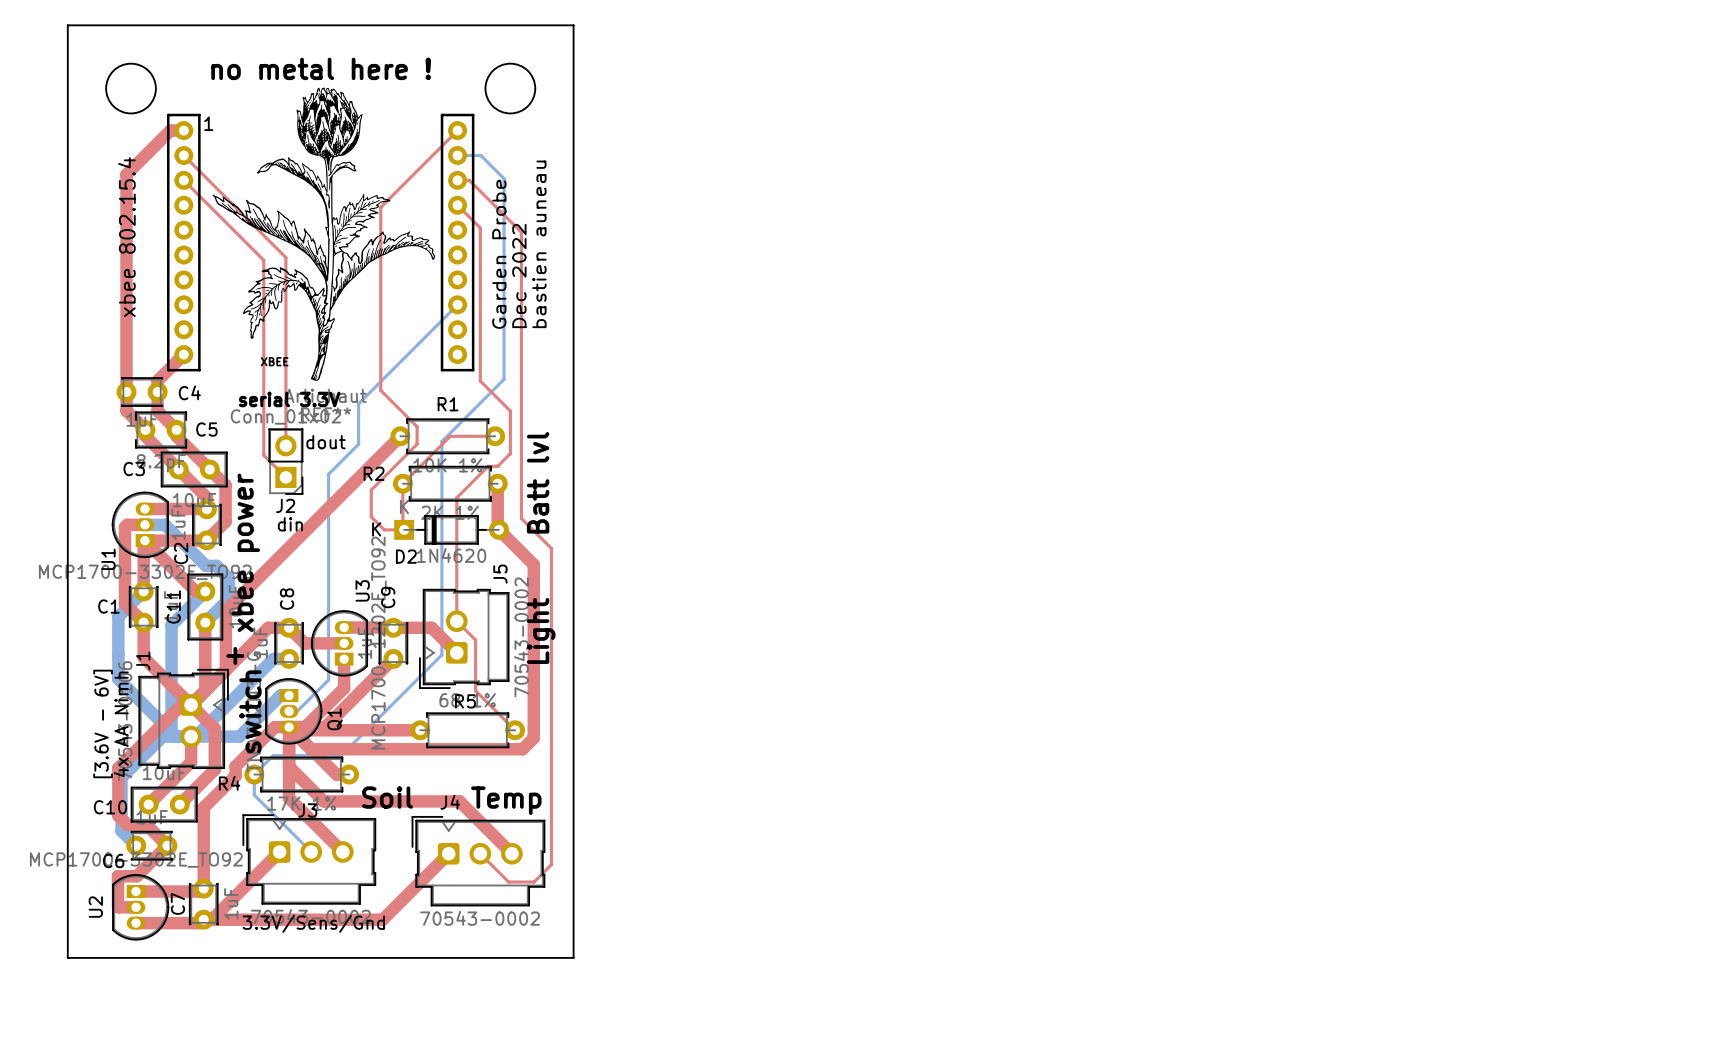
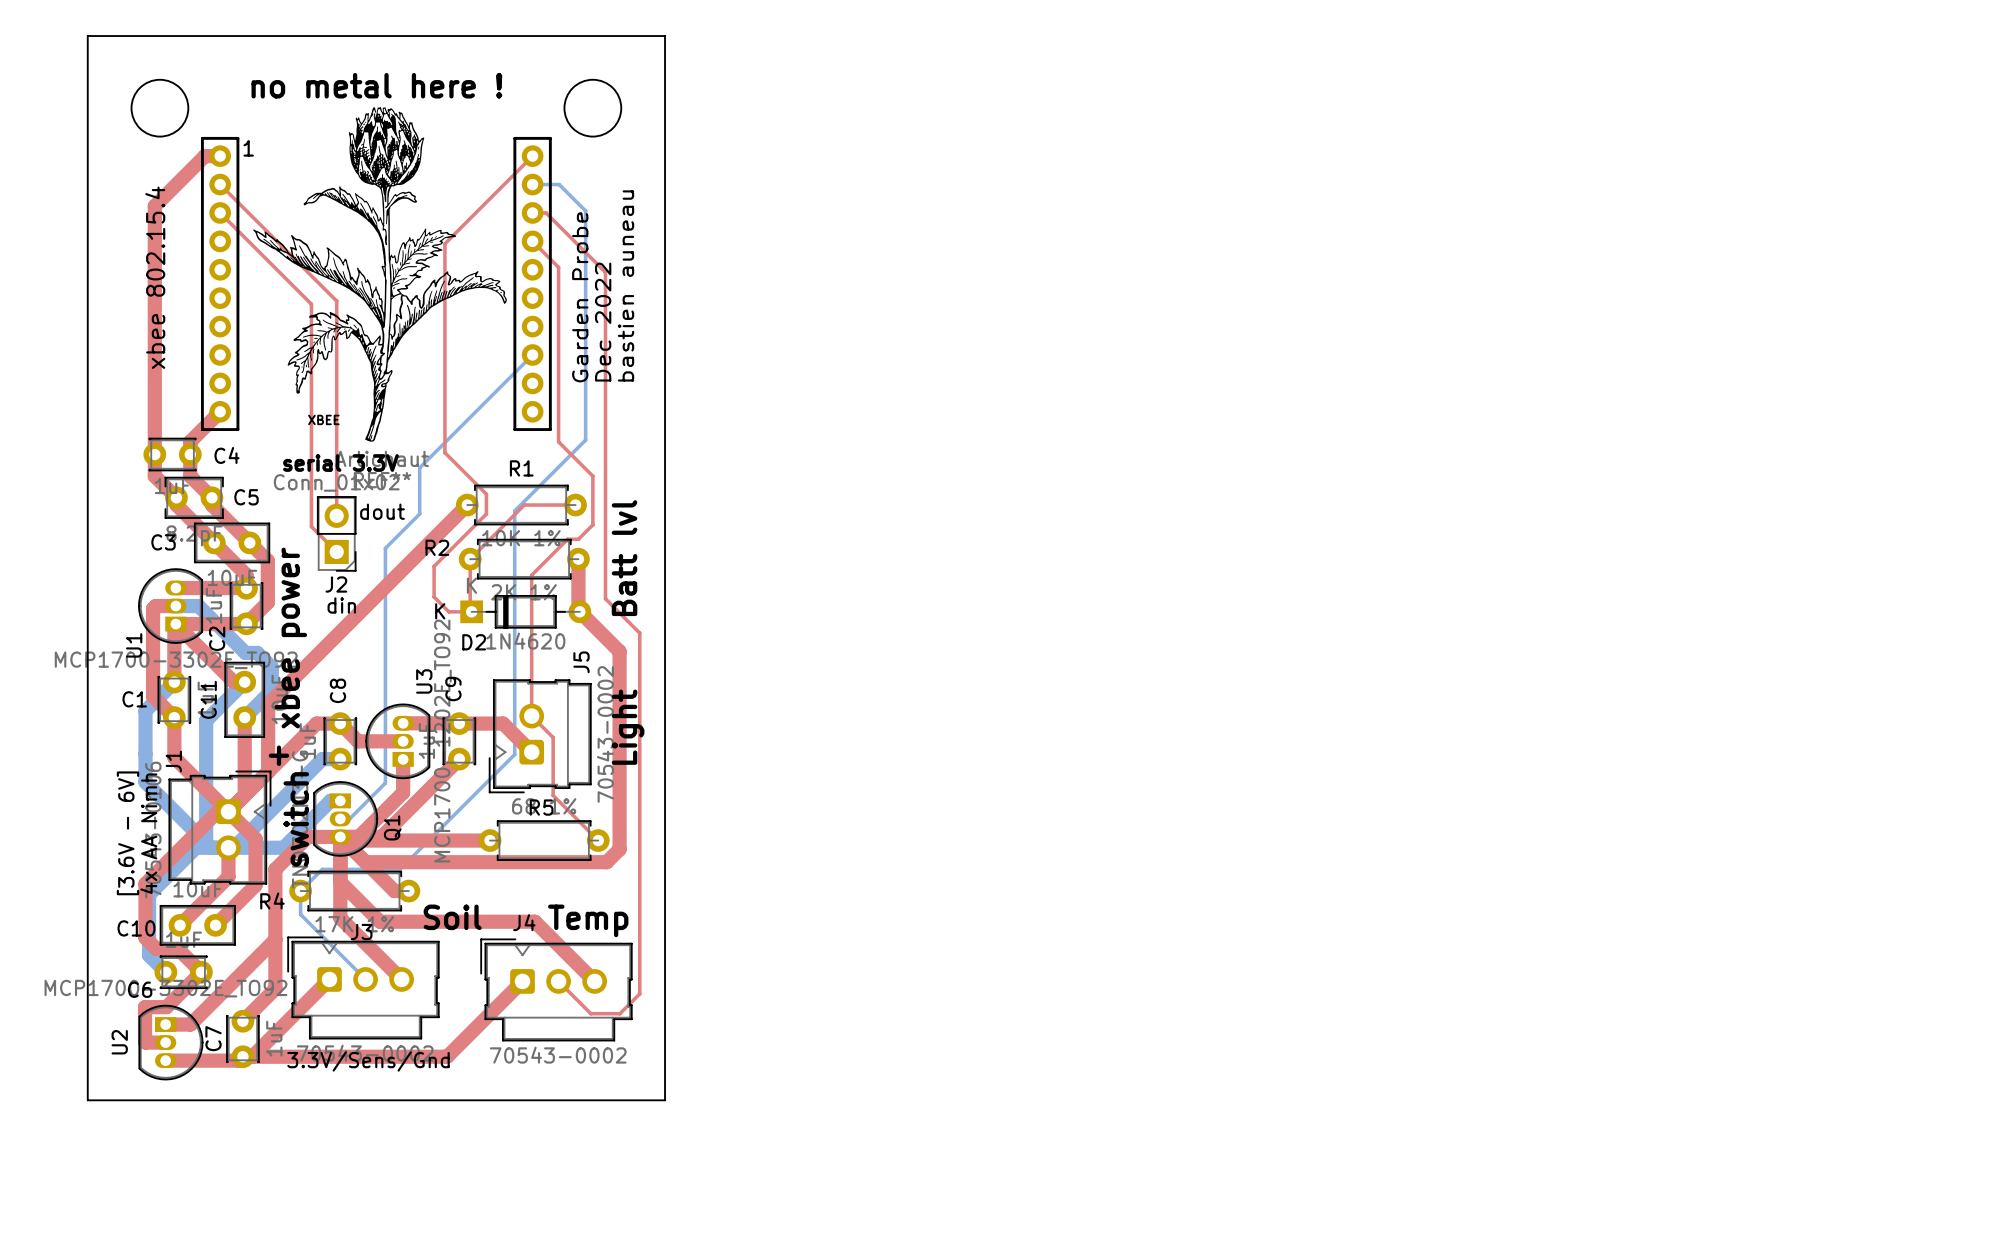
top track: (274, 727) (235, 766) (235, 775) (203, 807) (203, 888) (200, 891) (157, 891) -> (324, 836) (307, 836) (275, 869) (275, 988) (242, 1021)
top track: none -> (275, 939) (190, 1024)

